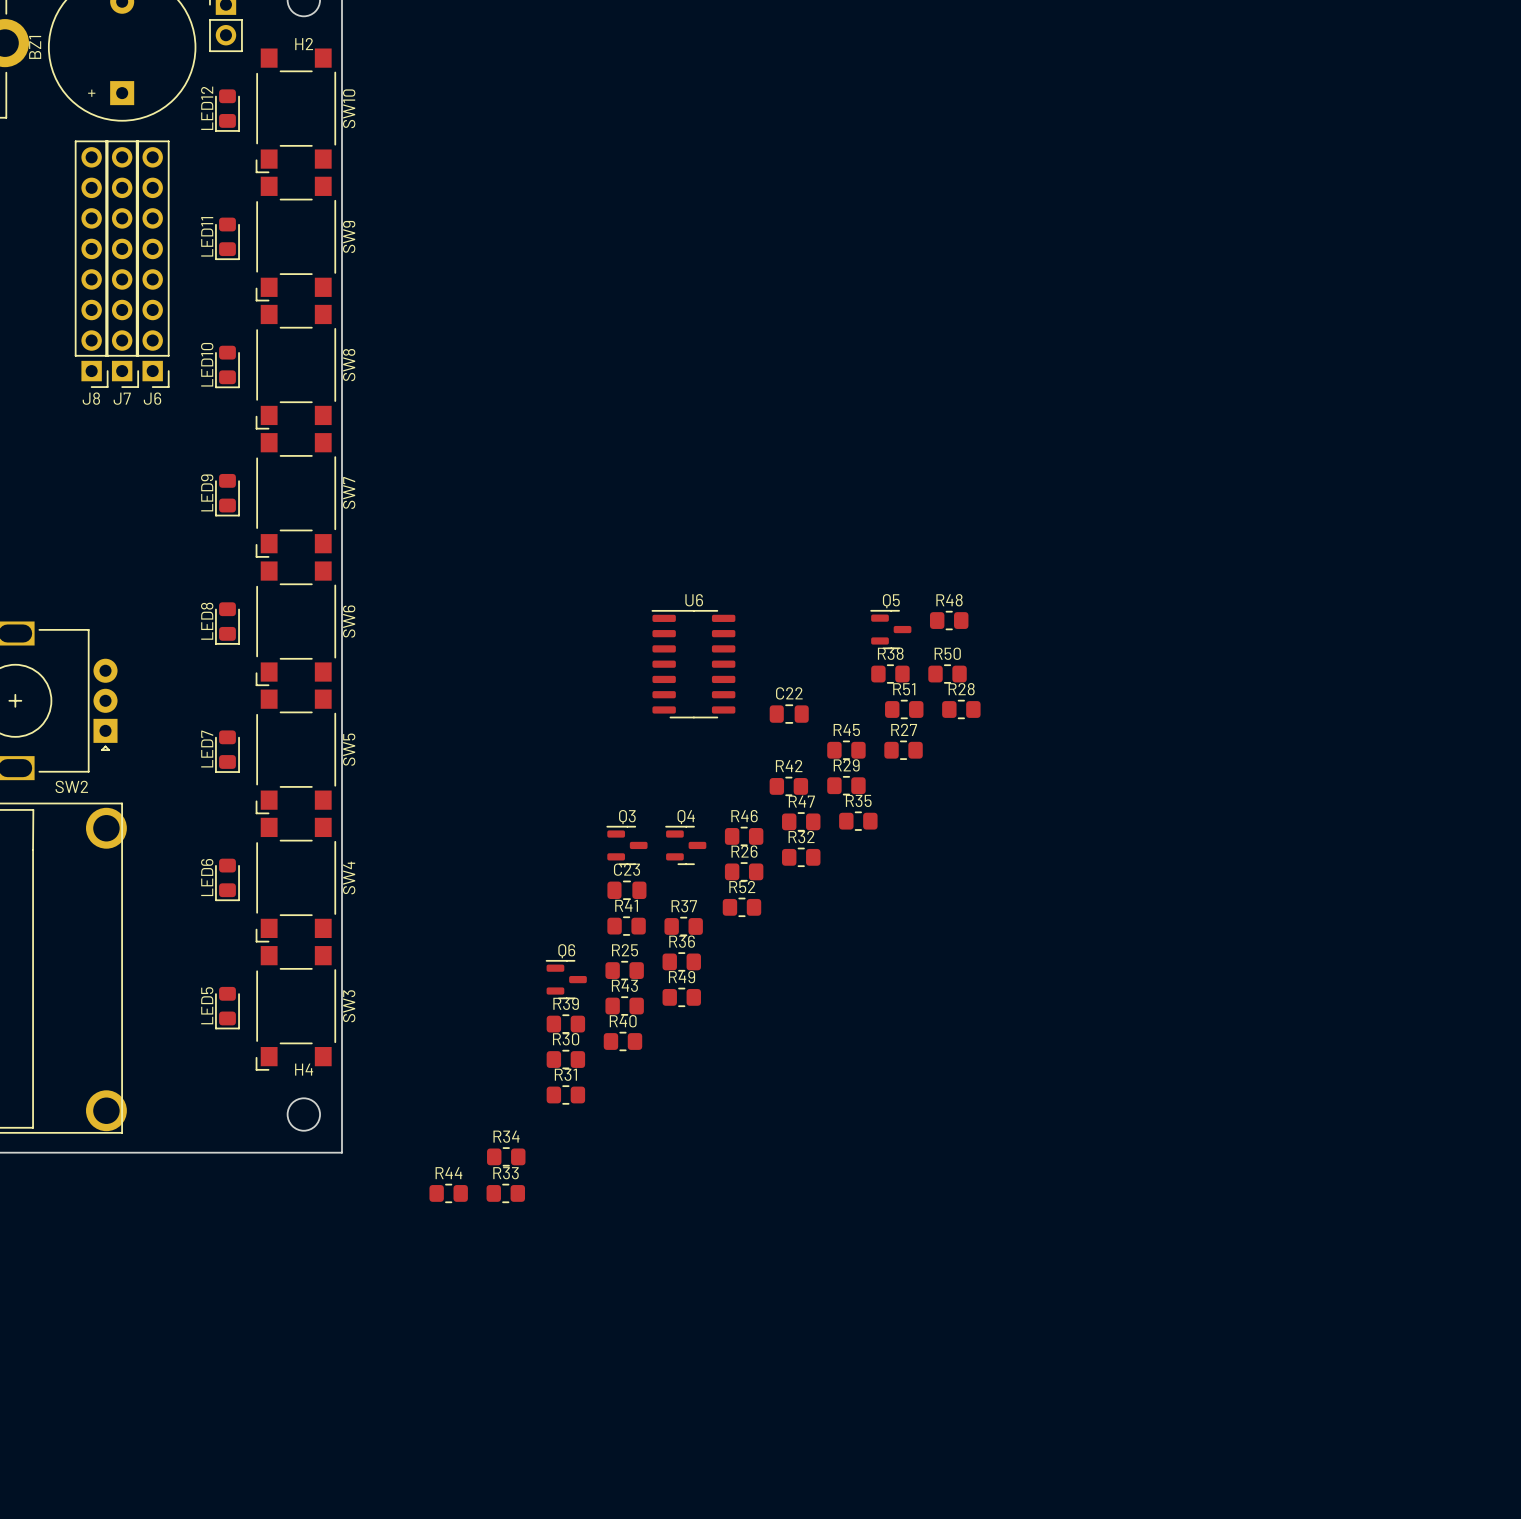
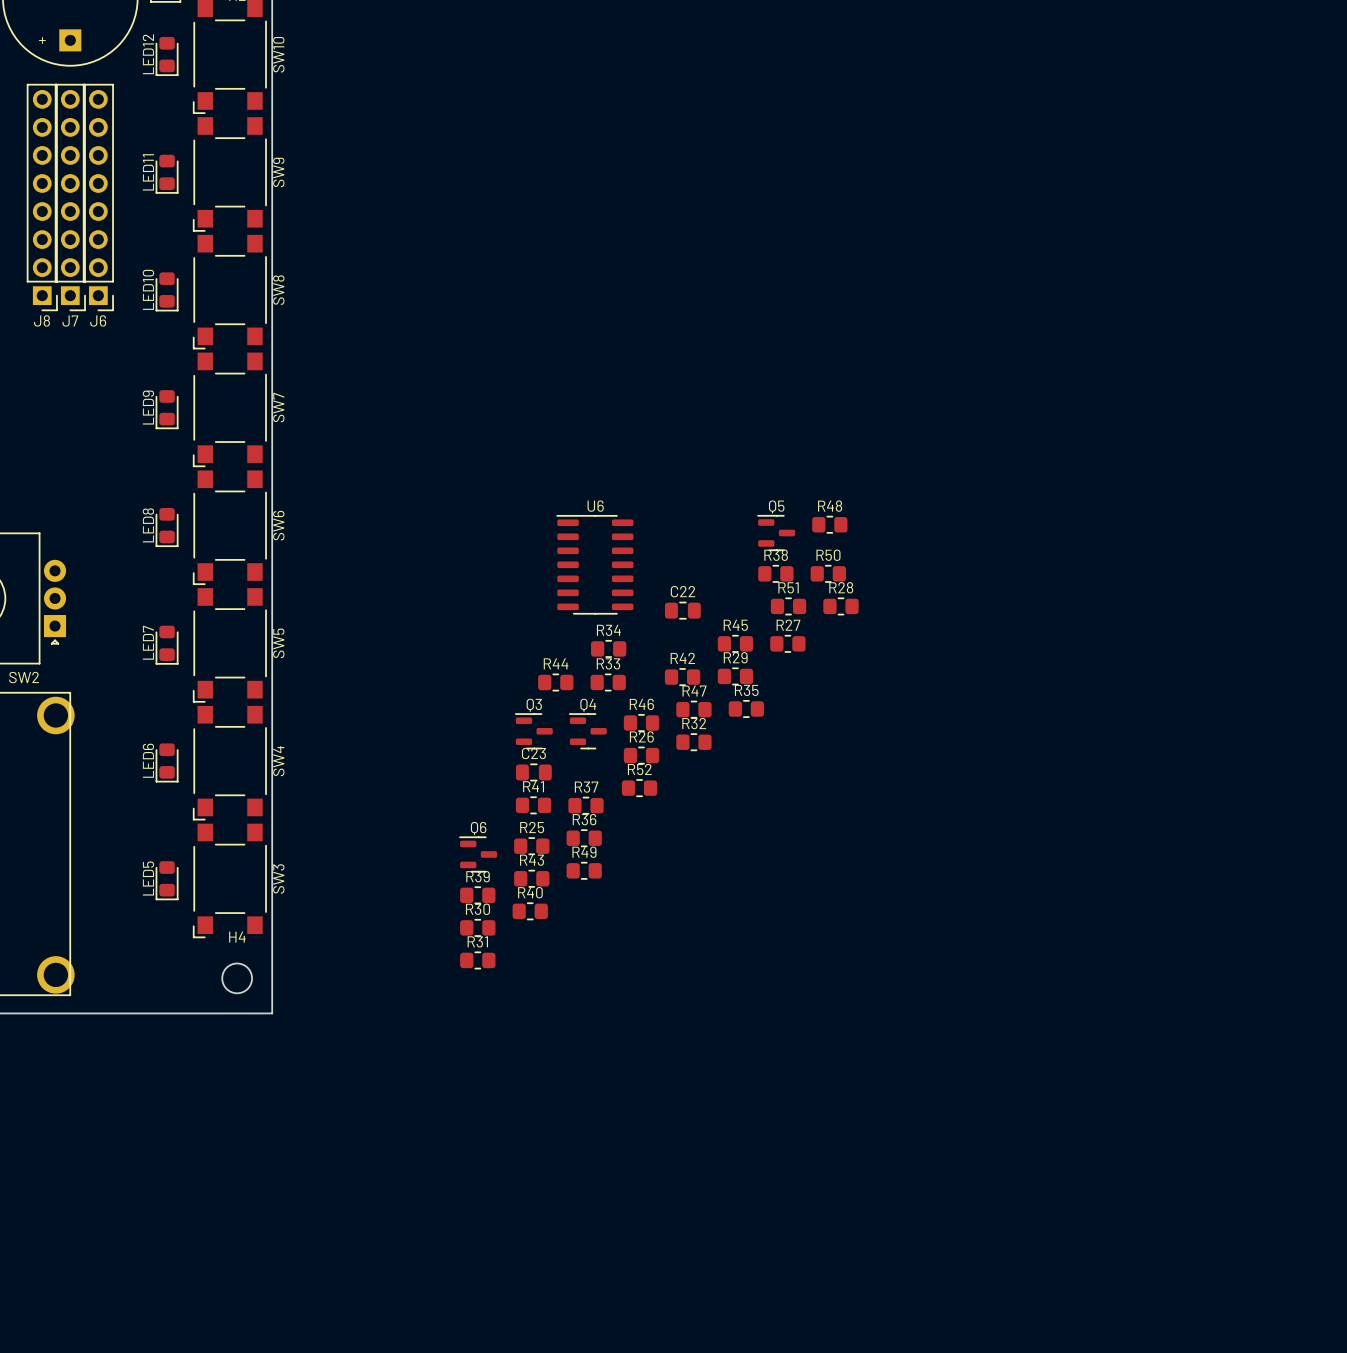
R34 position: (506, 1156) -> (608, 648)
R44 position: (448, 1193) -> (555, 682)
R33 position: (505, 1193) -> (608, 682)

